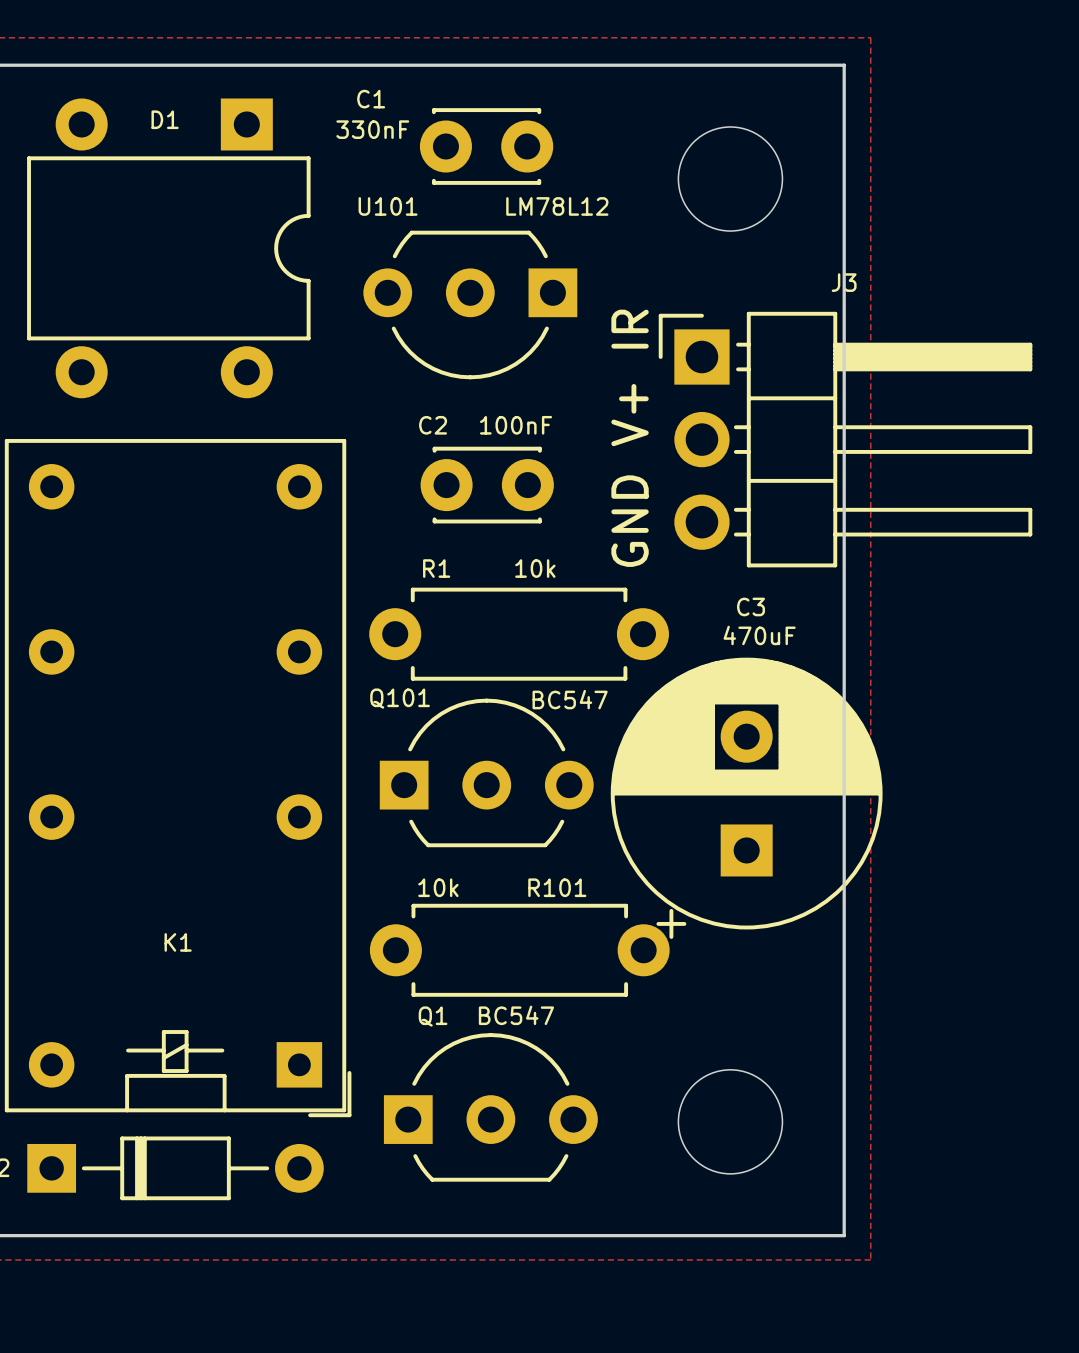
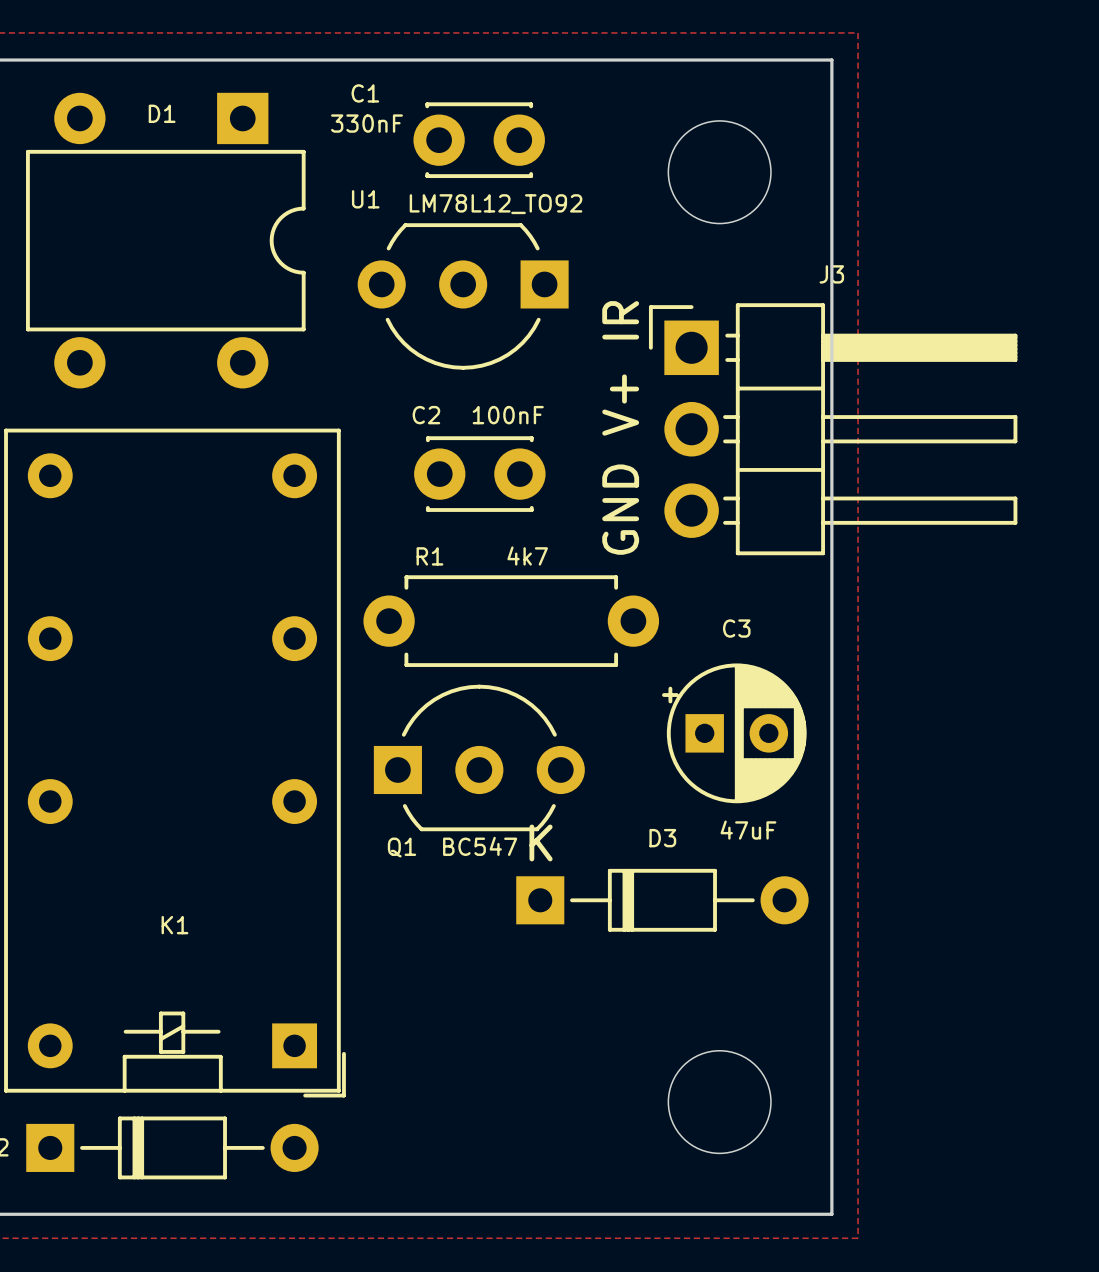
U101 name: U101 (388, 206) -> U1 (365, 199)
U101 value: LM78L12 (557, 206) -> LM78L12_TO92 (496, 204)
R1 value: 10k (535, 568) -> 4k7 (527, 556)
C3 name position: C3 (751, 606) -> C3 (736, 628)
C3 value: 470uF (759, 635) -> 47uF (748, 830)
C3 footprint: [610, 657, 883, 939] -> [662, 663, 807, 804]
Q101 name: Q101 (400, 698) -> Q1 (401, 847)
Q101 value position: BC547 (570, 699) -> BC547 (480, 846)
D3: none -> (662, 900)
R101: 10k (519, 950) -> none
Q1: BC547 (490, 1107) -> none

